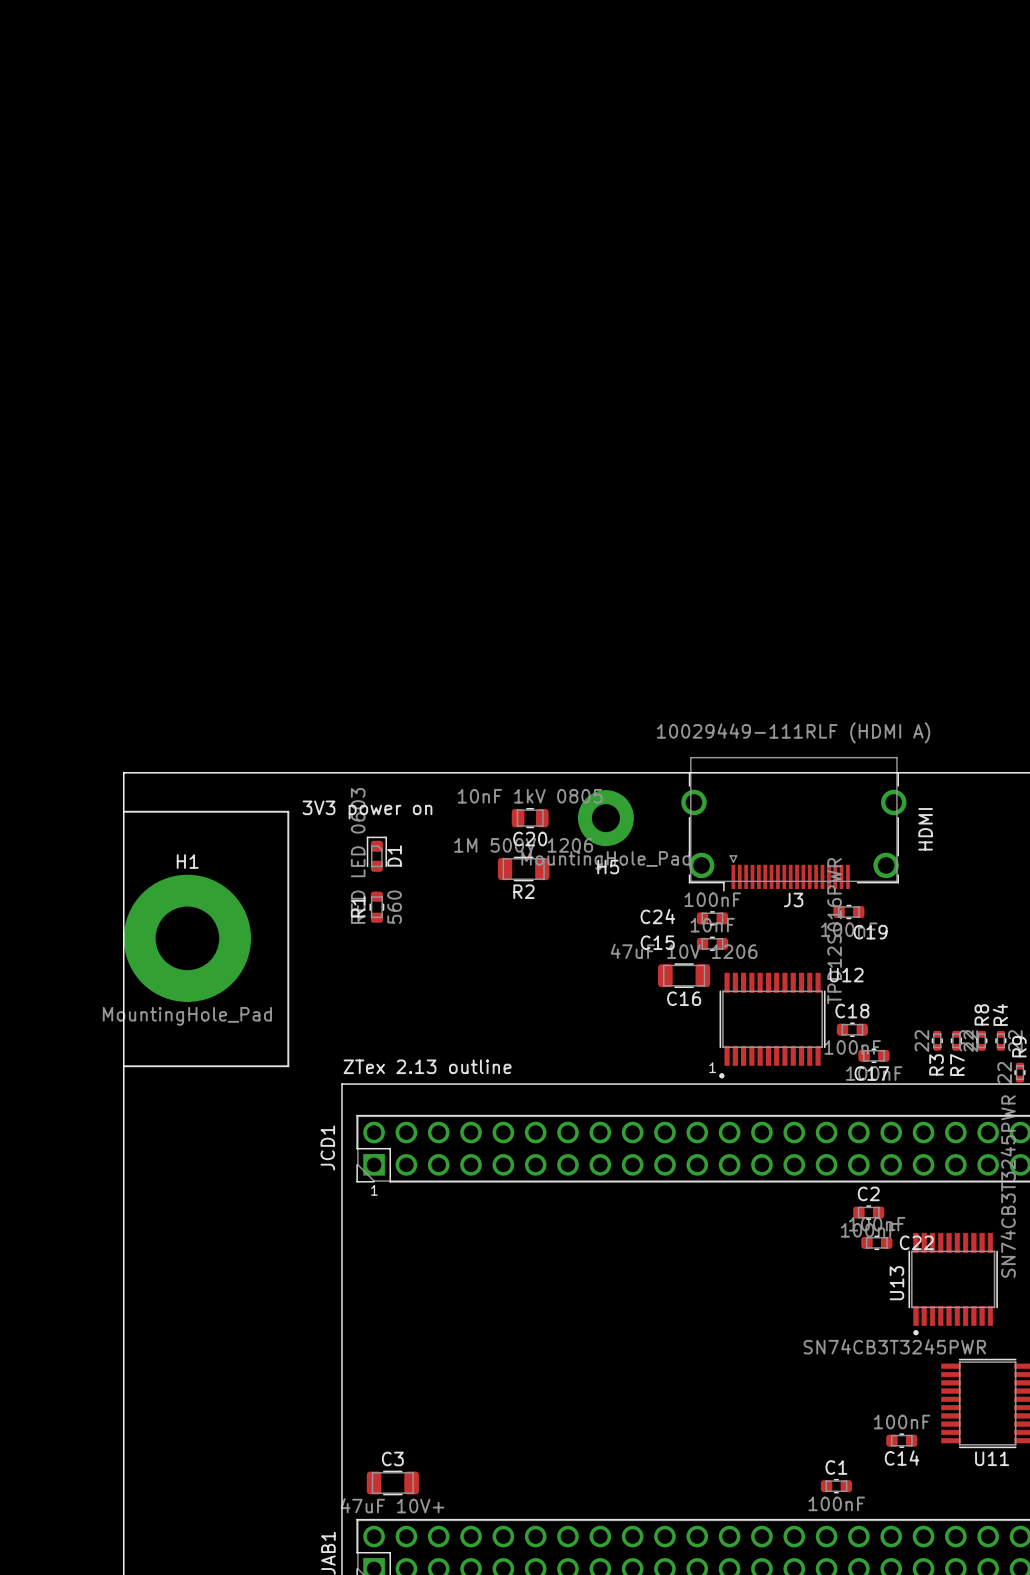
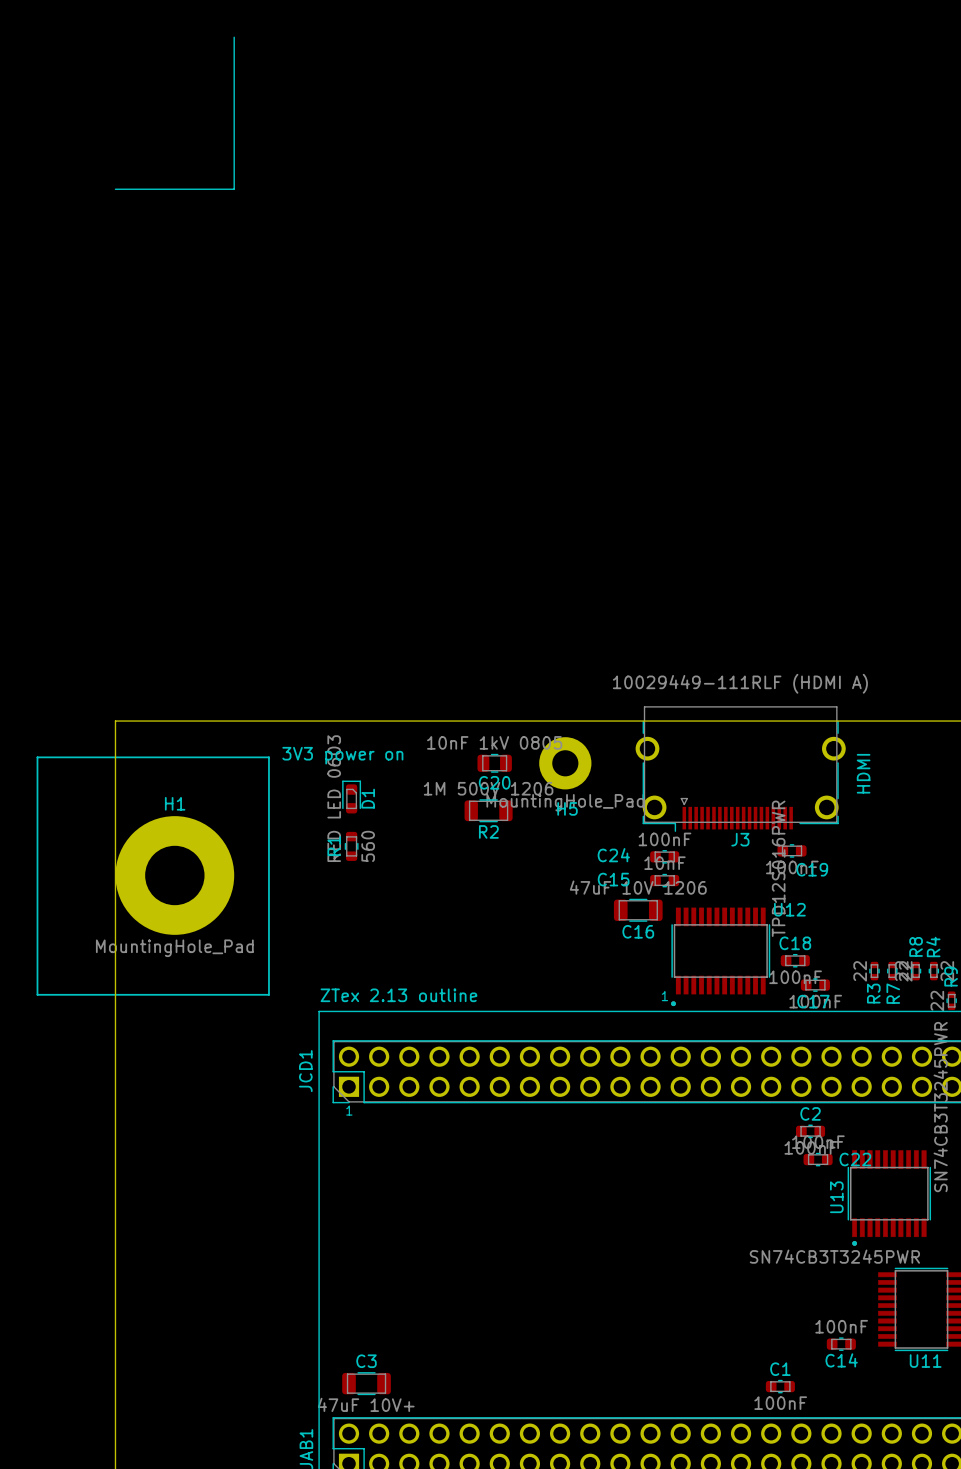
line: none -> (234, 37) (234, 189) (115, 189)
line: none -> (115, 757) (37, 757) (37, 994) (115, 994)

